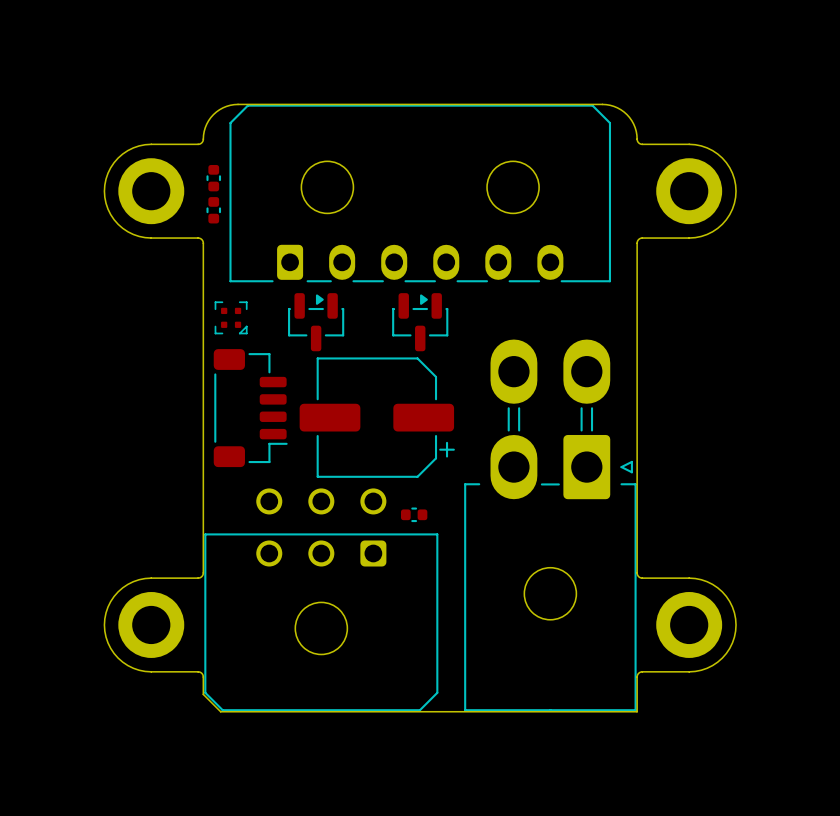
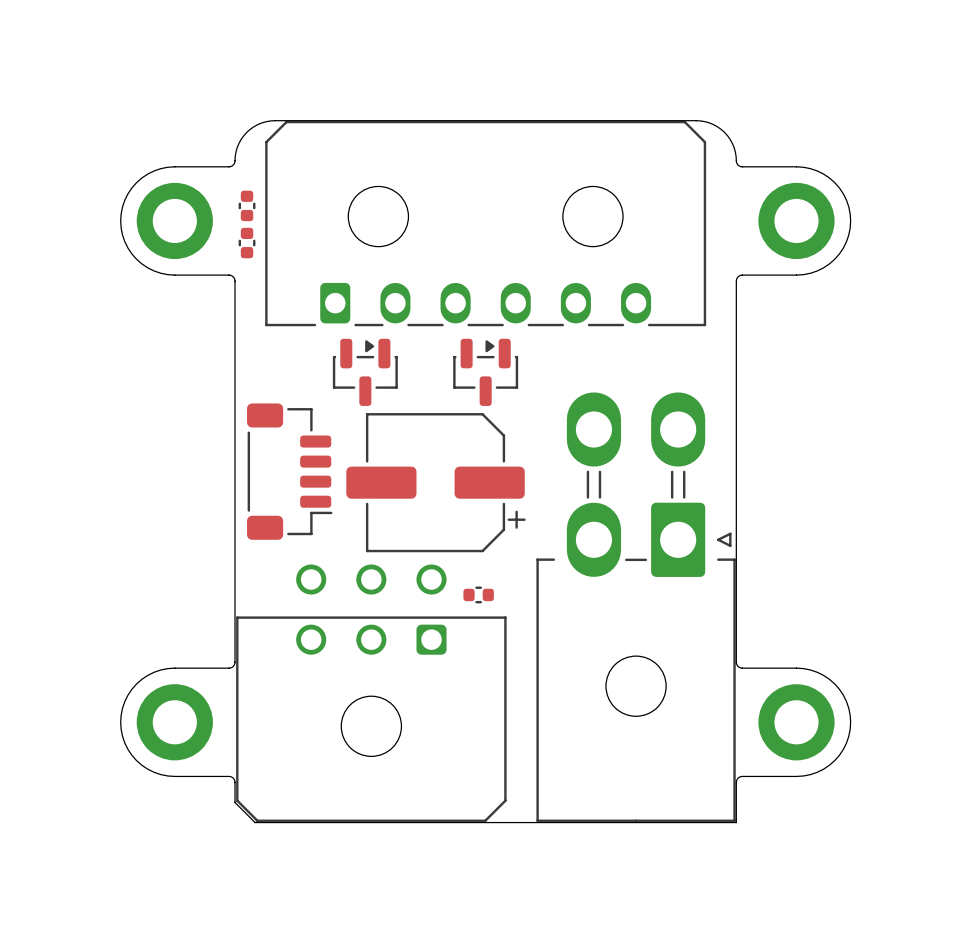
part: (231, 317) -> none

